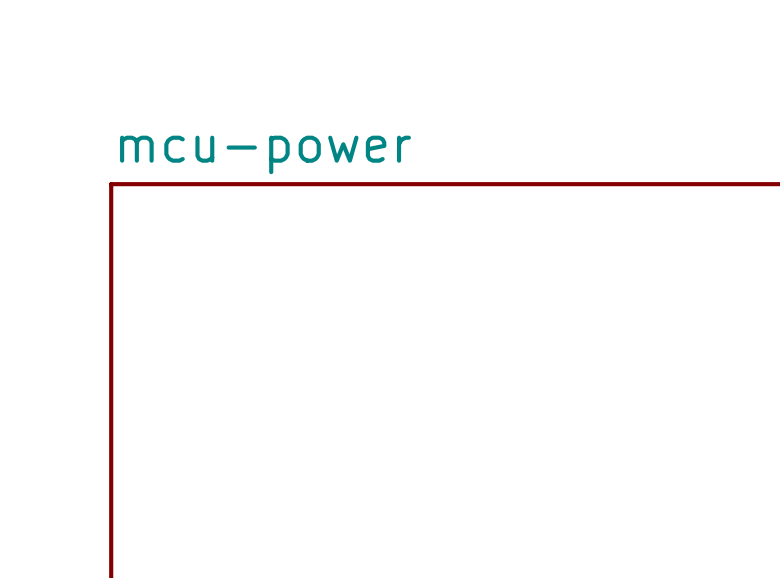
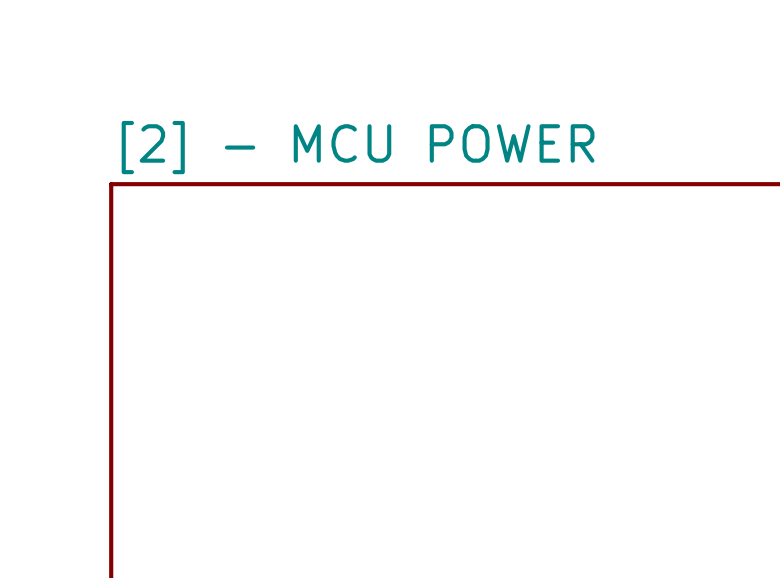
sheet mcu-power name: mcu-power (265, 154) -> [2] - MCU POWER (358, 147)

